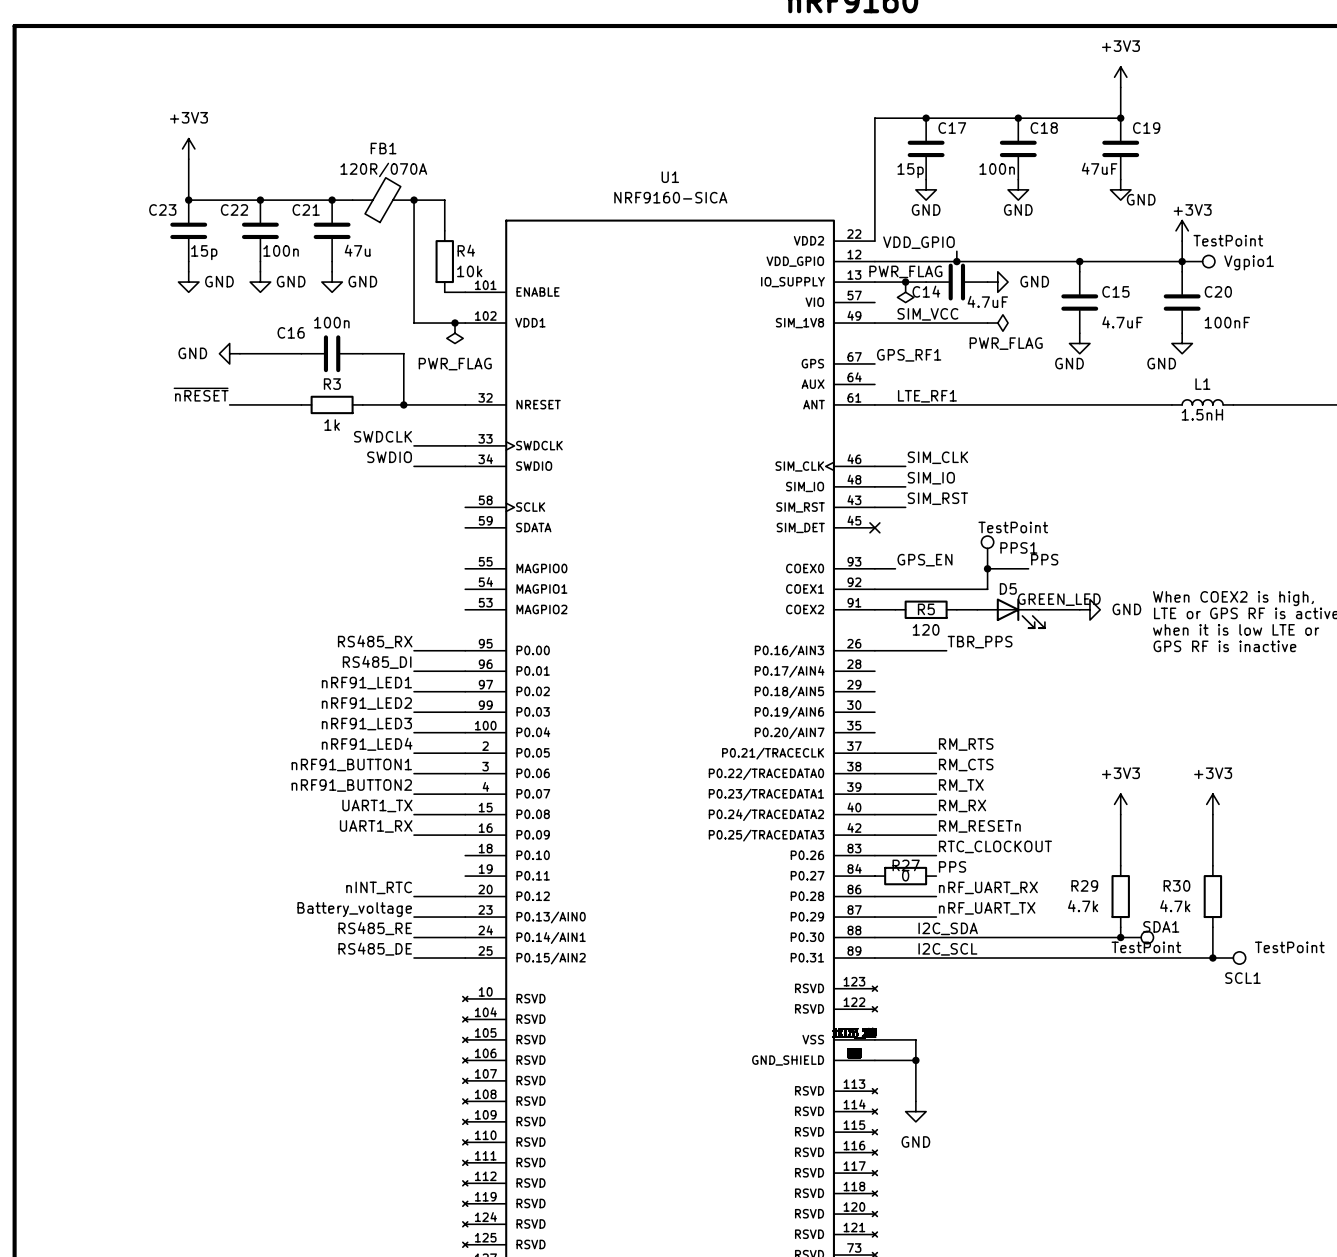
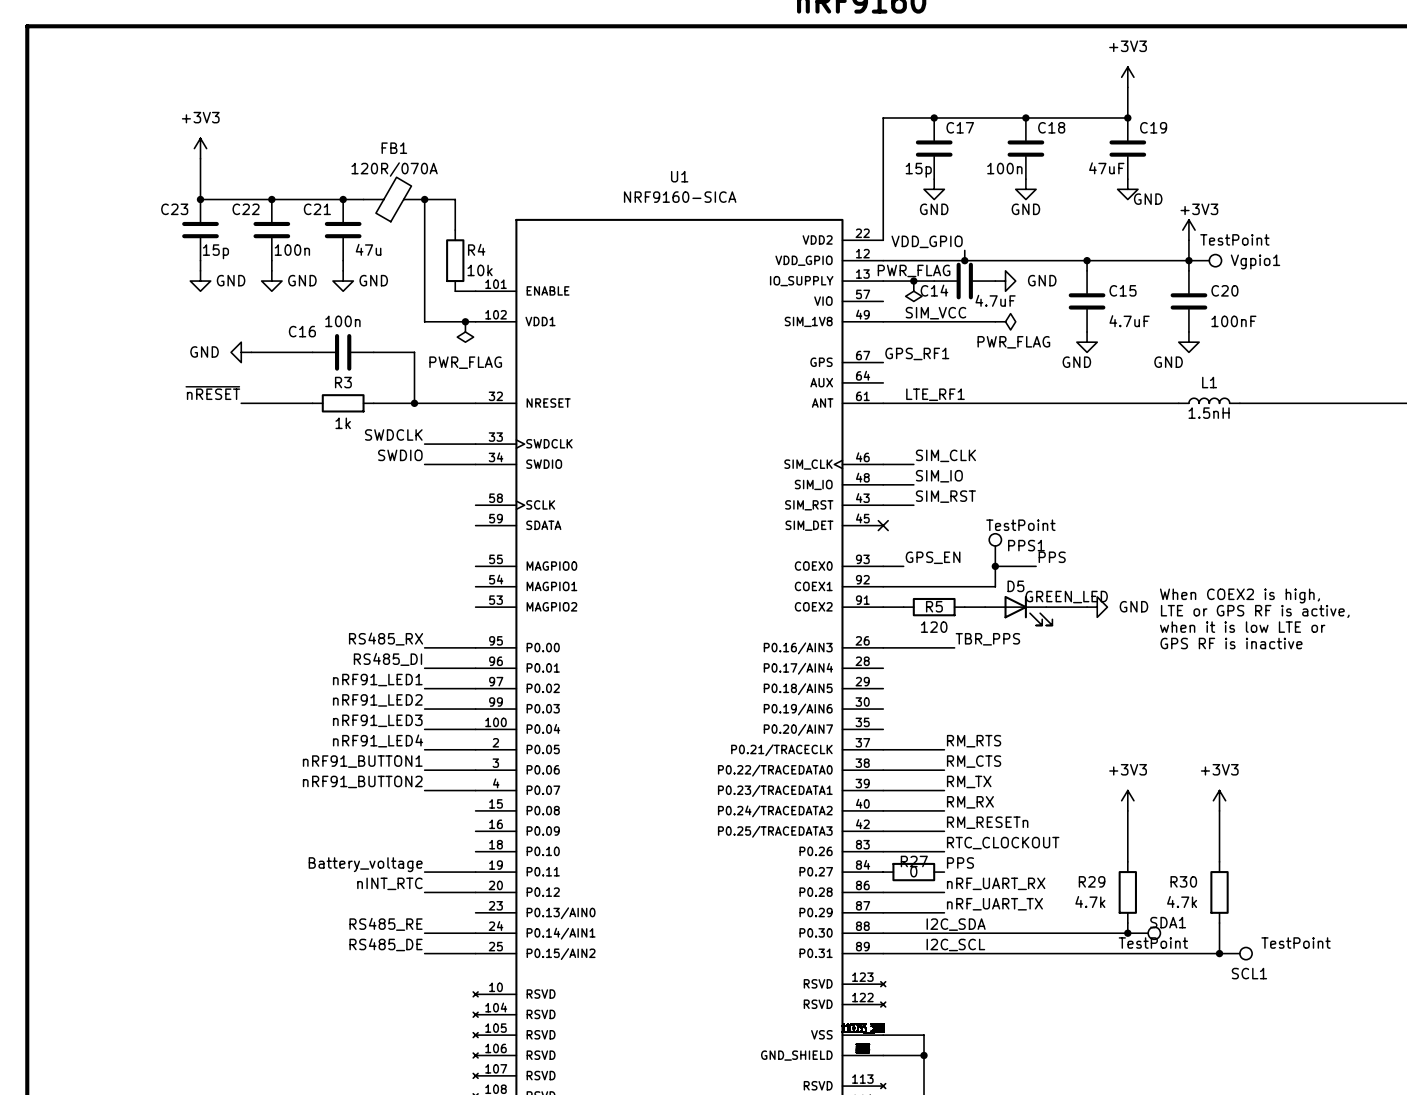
label: UART1_TX (377, 805) -> none
wire: (414, 814) (465, 814) -> none
label: UART1_RX (376, 826) -> none
wire: (414, 835) (465, 835) -> (424, 872) (475, 872)
label position: Battery_voltage (354, 909) -> Battery_voltage (365, 864)
wire: (414, 917) (465, 917) -> none

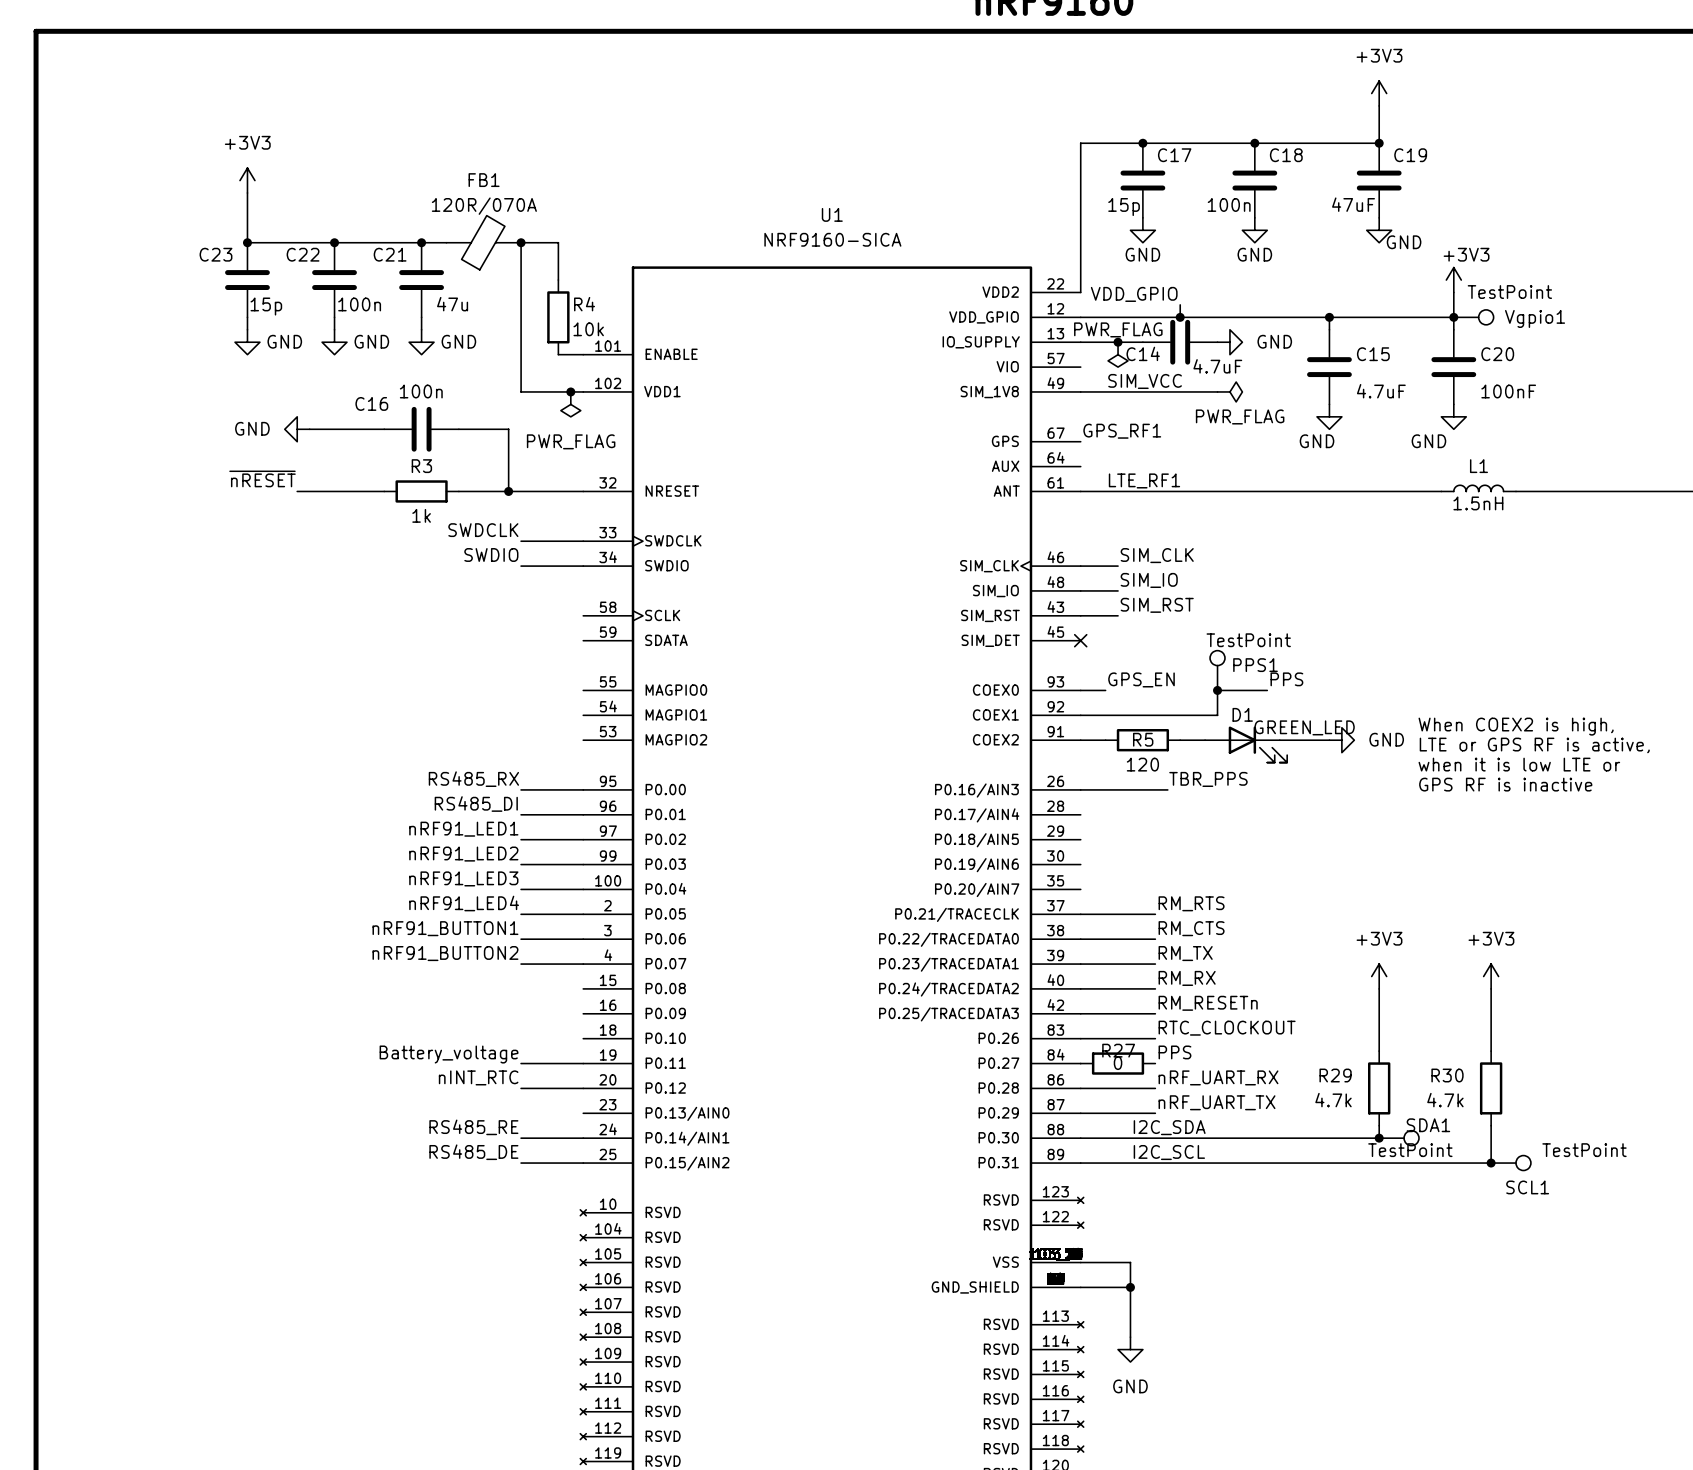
D5 name: D5 (1015, 586) -> D1 (1242, 714)

